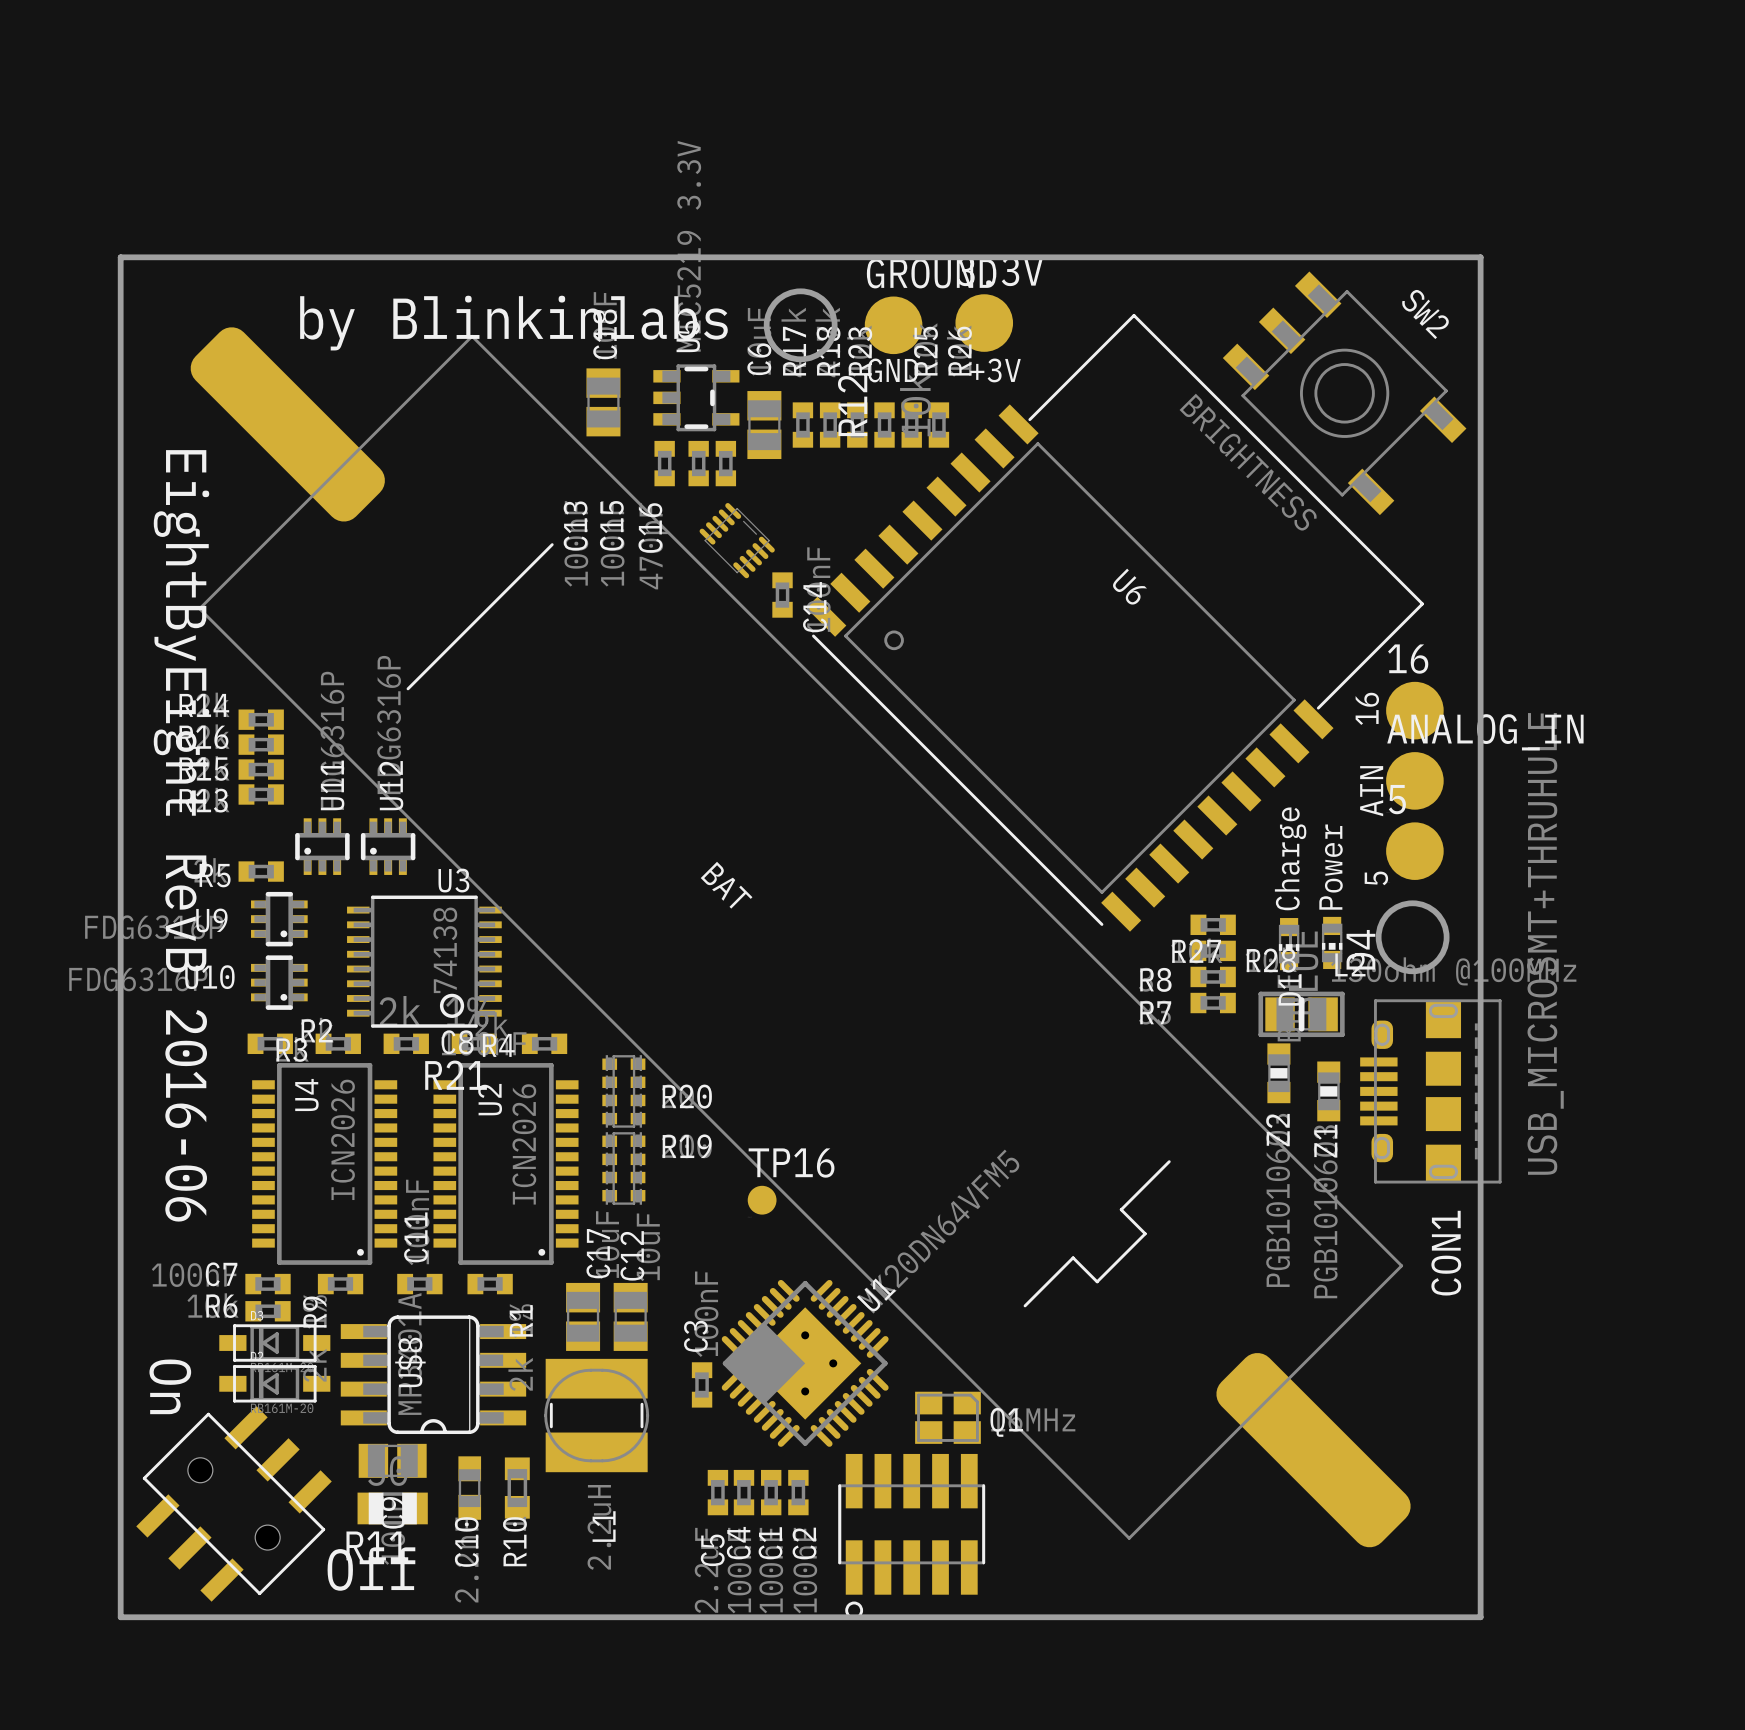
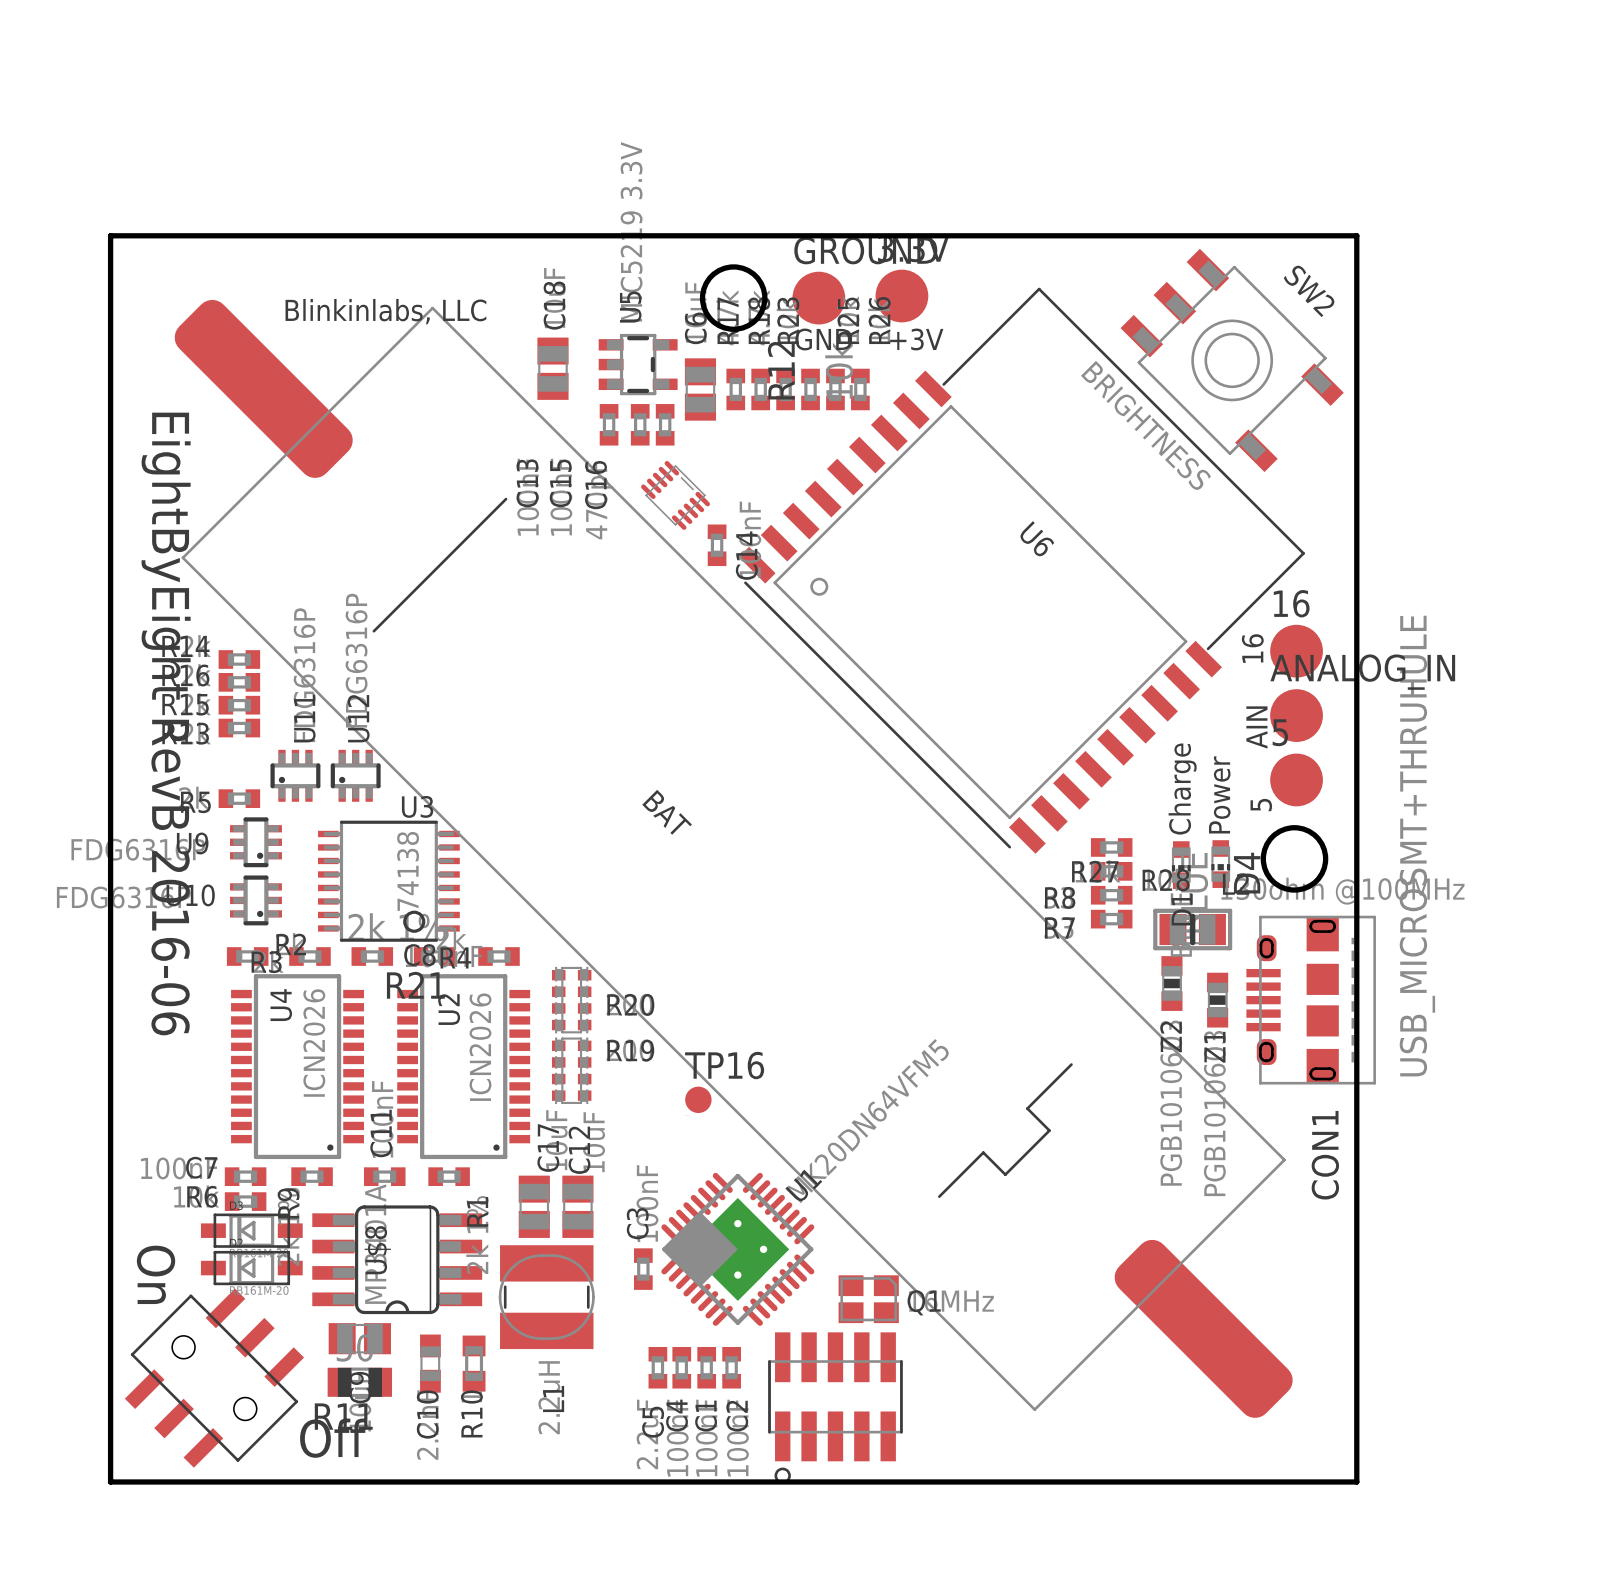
text: by Blinkinlabs (513, 323) -> Blinkinlabs, LLC (385, 311)

